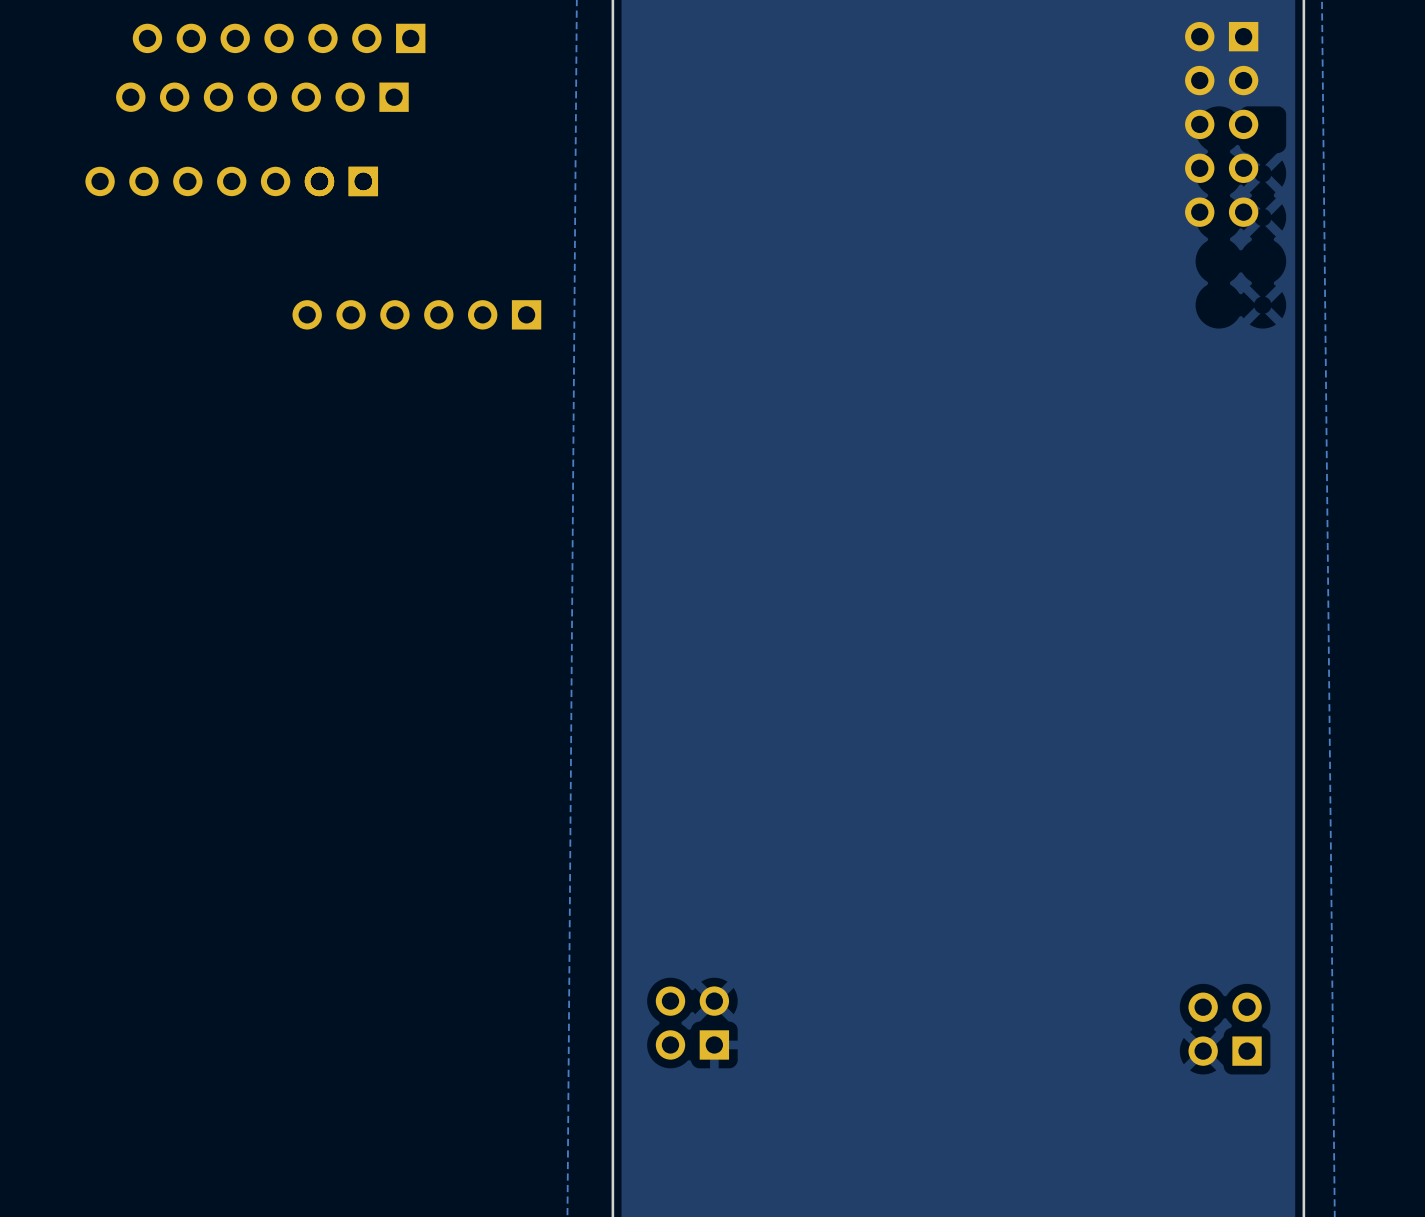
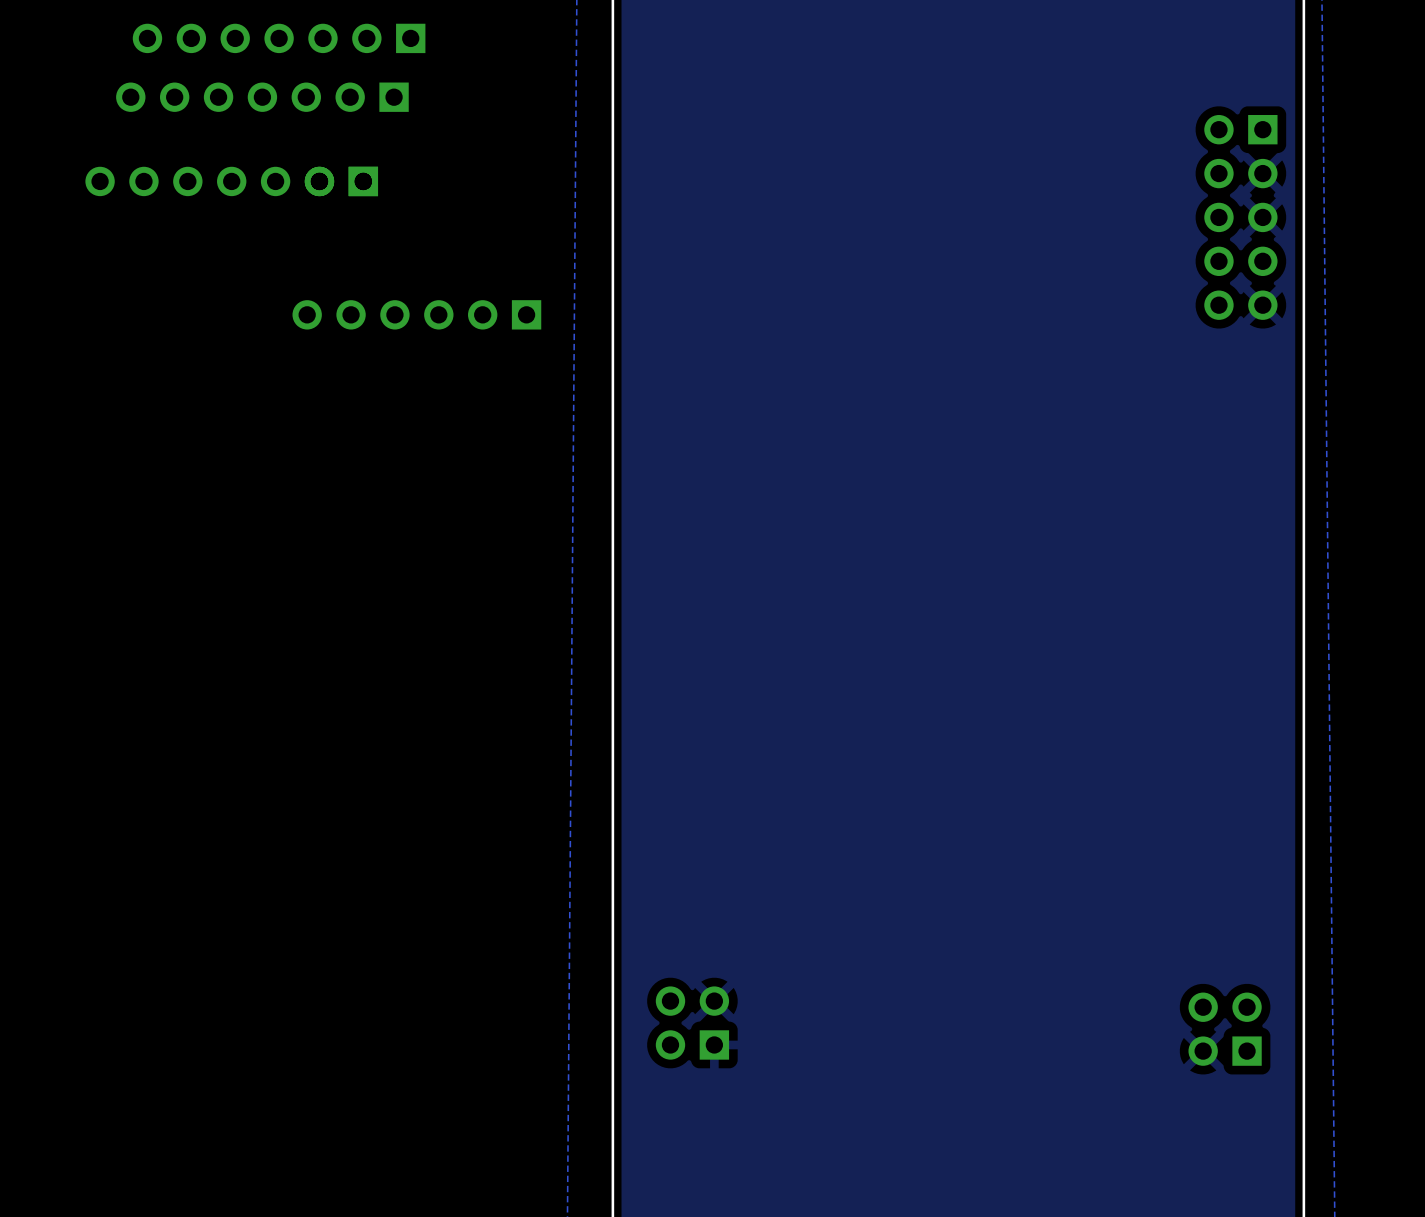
part position: (1221, 124) -> (1240, 217)

